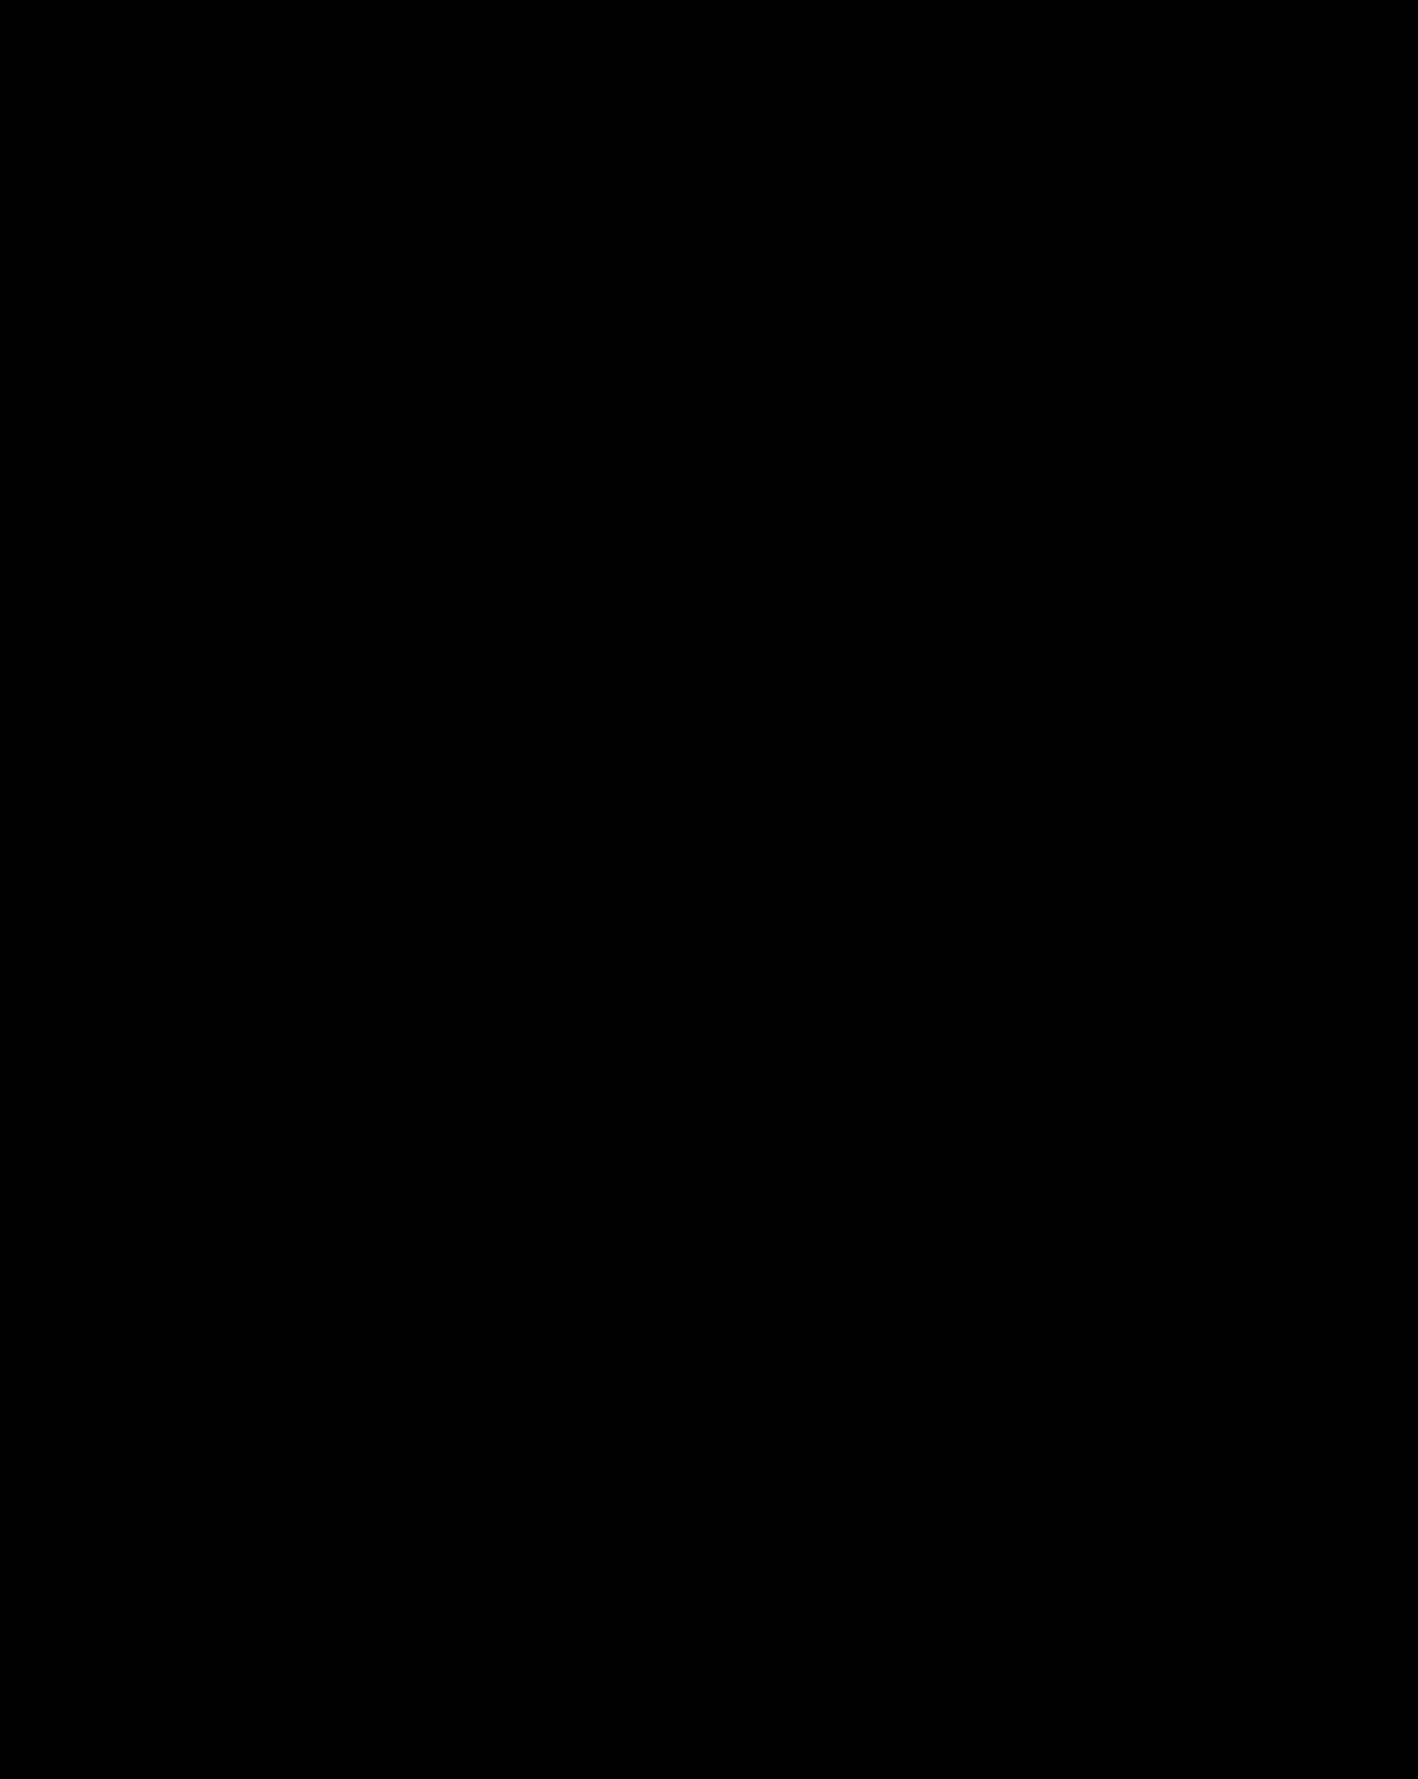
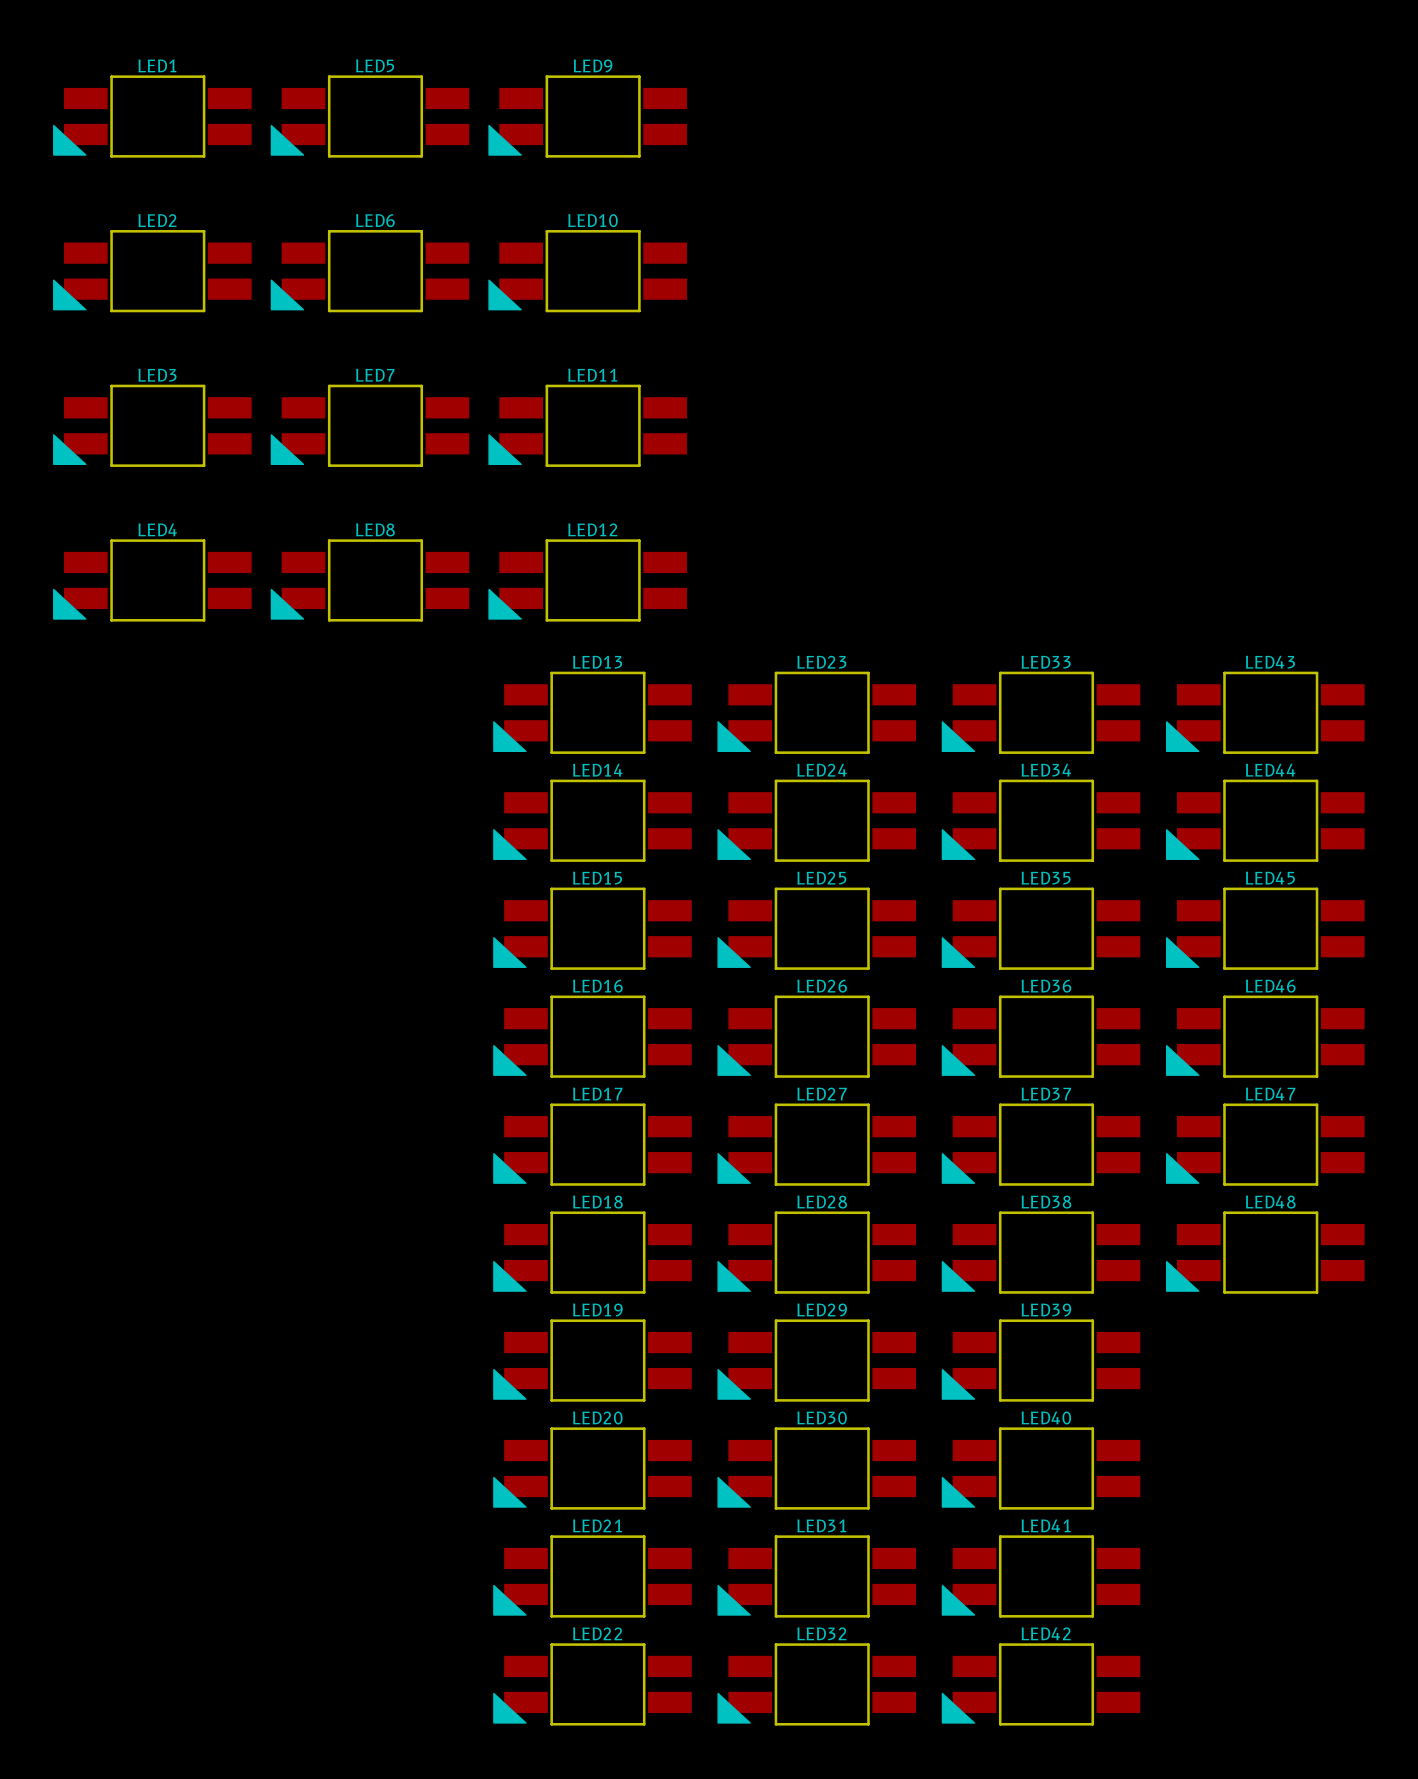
LED1: none -> (152, 116)
LED5: none -> (370, 116)
LED9: none -> (587, 116)
LED2: none -> (152, 271)
LED6: none -> (370, 271)
LED10: none -> (587, 271)
LED3: none -> (152, 425)
LED7: none -> (370, 425)
LED11: none -> (587, 425)
LED4: none -> (152, 580)
LED8: none -> (370, 580)
LED12: none -> (587, 580)
LED13: none -> (592, 712)
LED23: none -> (816, 712)
LED33: none -> (1041, 712)
LED43: none -> (1265, 712)
LED14: none -> (592, 820)
LED24: none -> (816, 820)
LED34: none -> (1041, 820)
LED44: none -> (1265, 820)
LED15: none -> (592, 928)
LED25: none -> (816, 928)
LED35: none -> (1041, 928)
LED45: none -> (1265, 928)
LED16: none -> (592, 1036)
LED26: none -> (816, 1036)
LED36: none -> (1041, 1036)
LED46: none -> (1265, 1036)
LED17: none -> (592, 1144)
LED27: none -> (816, 1144)
LED37: none -> (1041, 1144)
LED47: none -> (1265, 1144)
LED18: none -> (592, 1252)
LED28: none -> (816, 1252)
LED38: none -> (1041, 1252)
LED48: none -> (1265, 1252)
LED19: none -> (592, 1360)
LED29: none -> (816, 1360)
LED39: none -> (1041, 1360)
LED20: none -> (592, 1468)
LED30: none -> (816, 1468)
LED40: none -> (1041, 1468)
LED21: none -> (592, 1576)
LED31: none -> (816, 1576)
LED41: none -> (1041, 1576)
LED22: none -> (592, 1684)
LED32: none -> (816, 1684)
LED42: none -> (1041, 1684)

